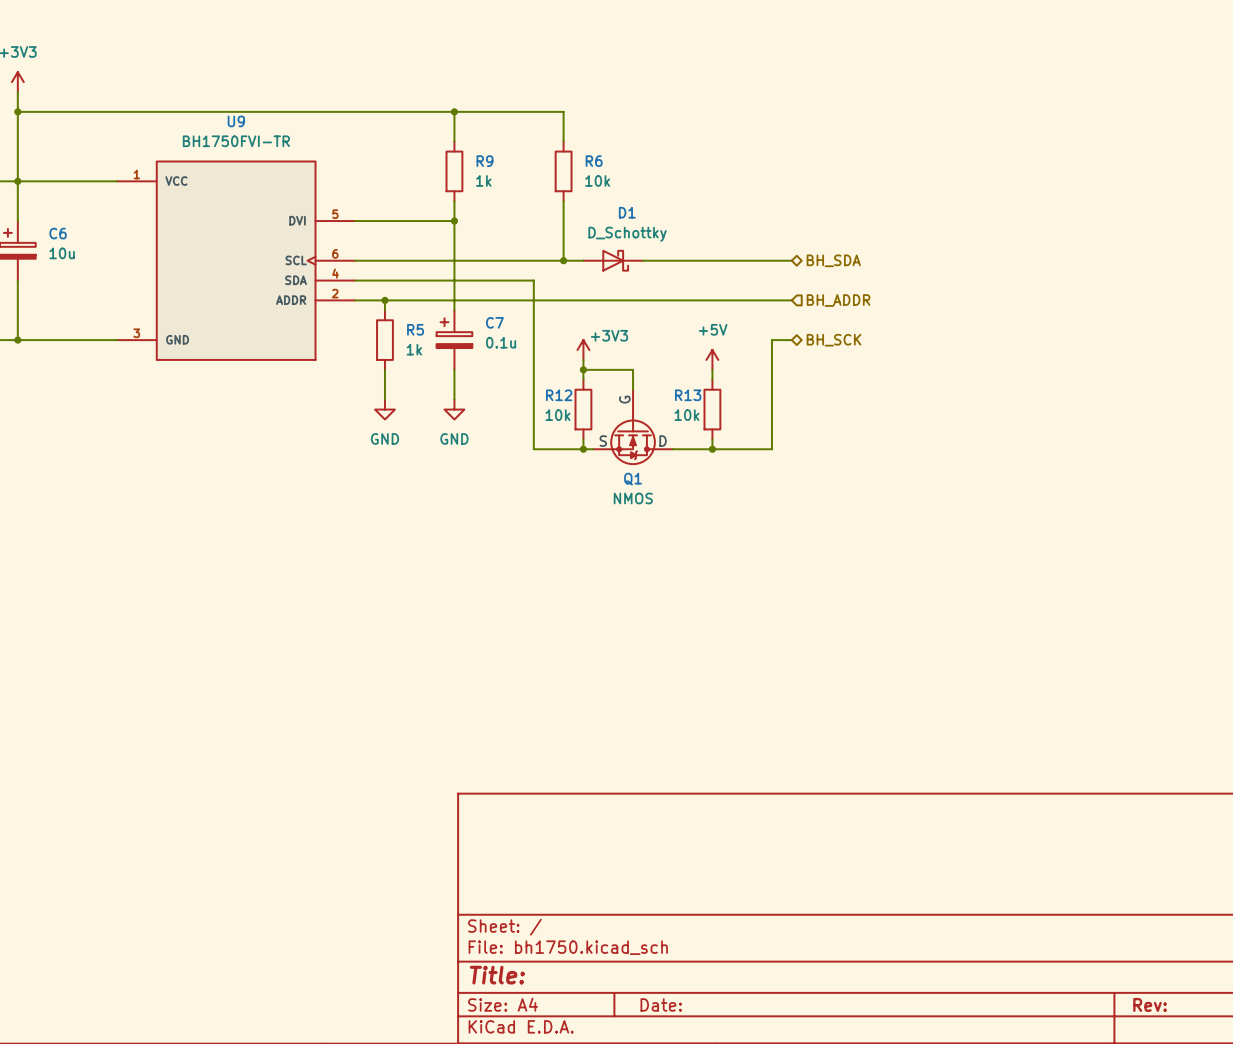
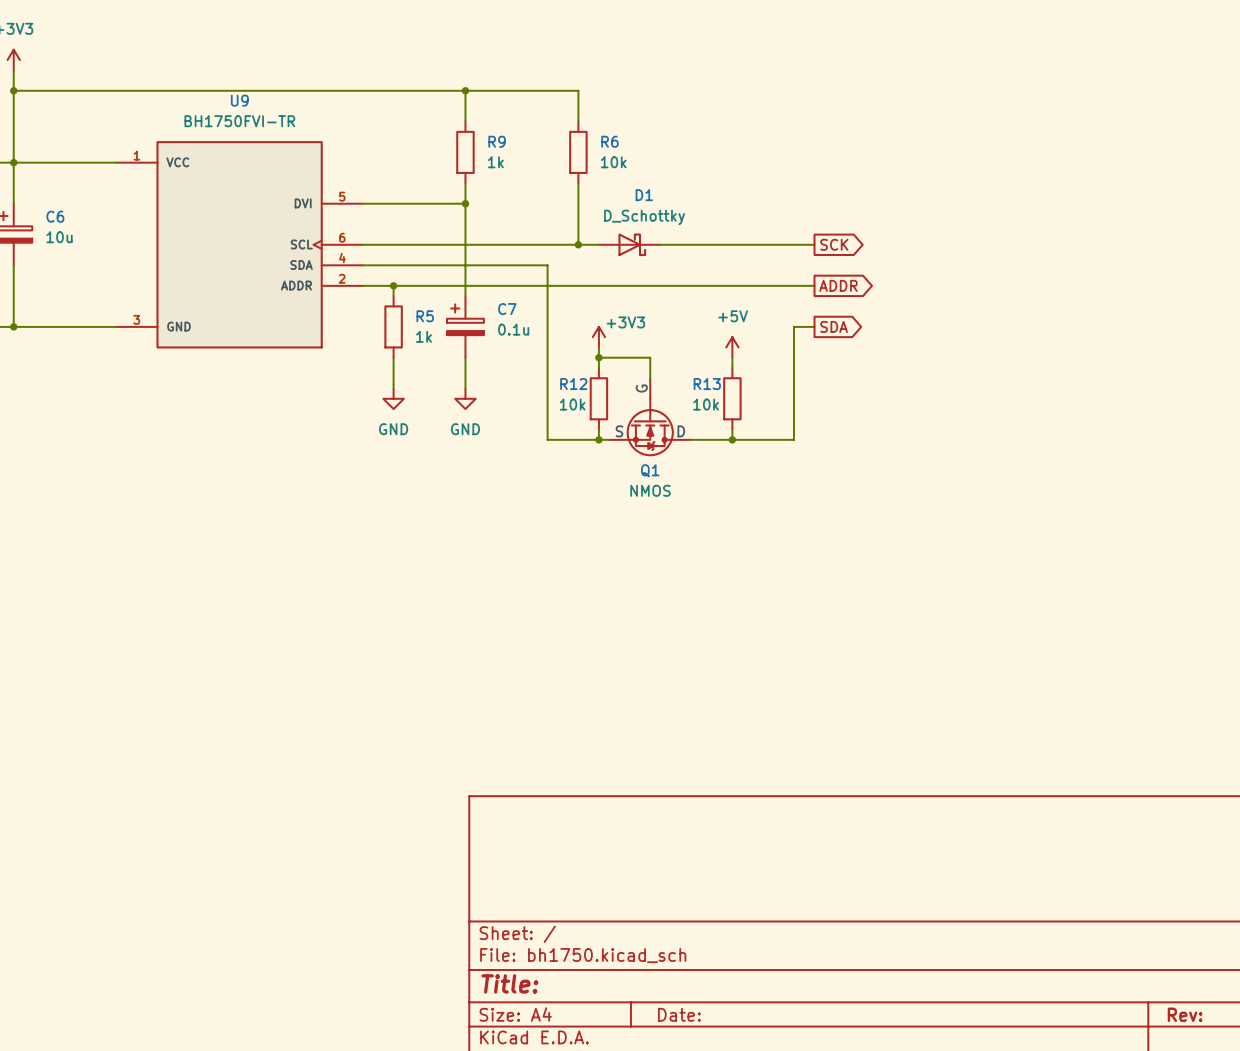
global label: none -> SCK (834, 244)
hierarchical label: BH_SDA (833, 260) -> none
global label: none -> ADDR (838, 285)
hierarchical label: BH_ADDR (838, 300) -> none
global label: none -> SDA (834, 326)
hierarchical label: BH_SCK (834, 340) -> none

